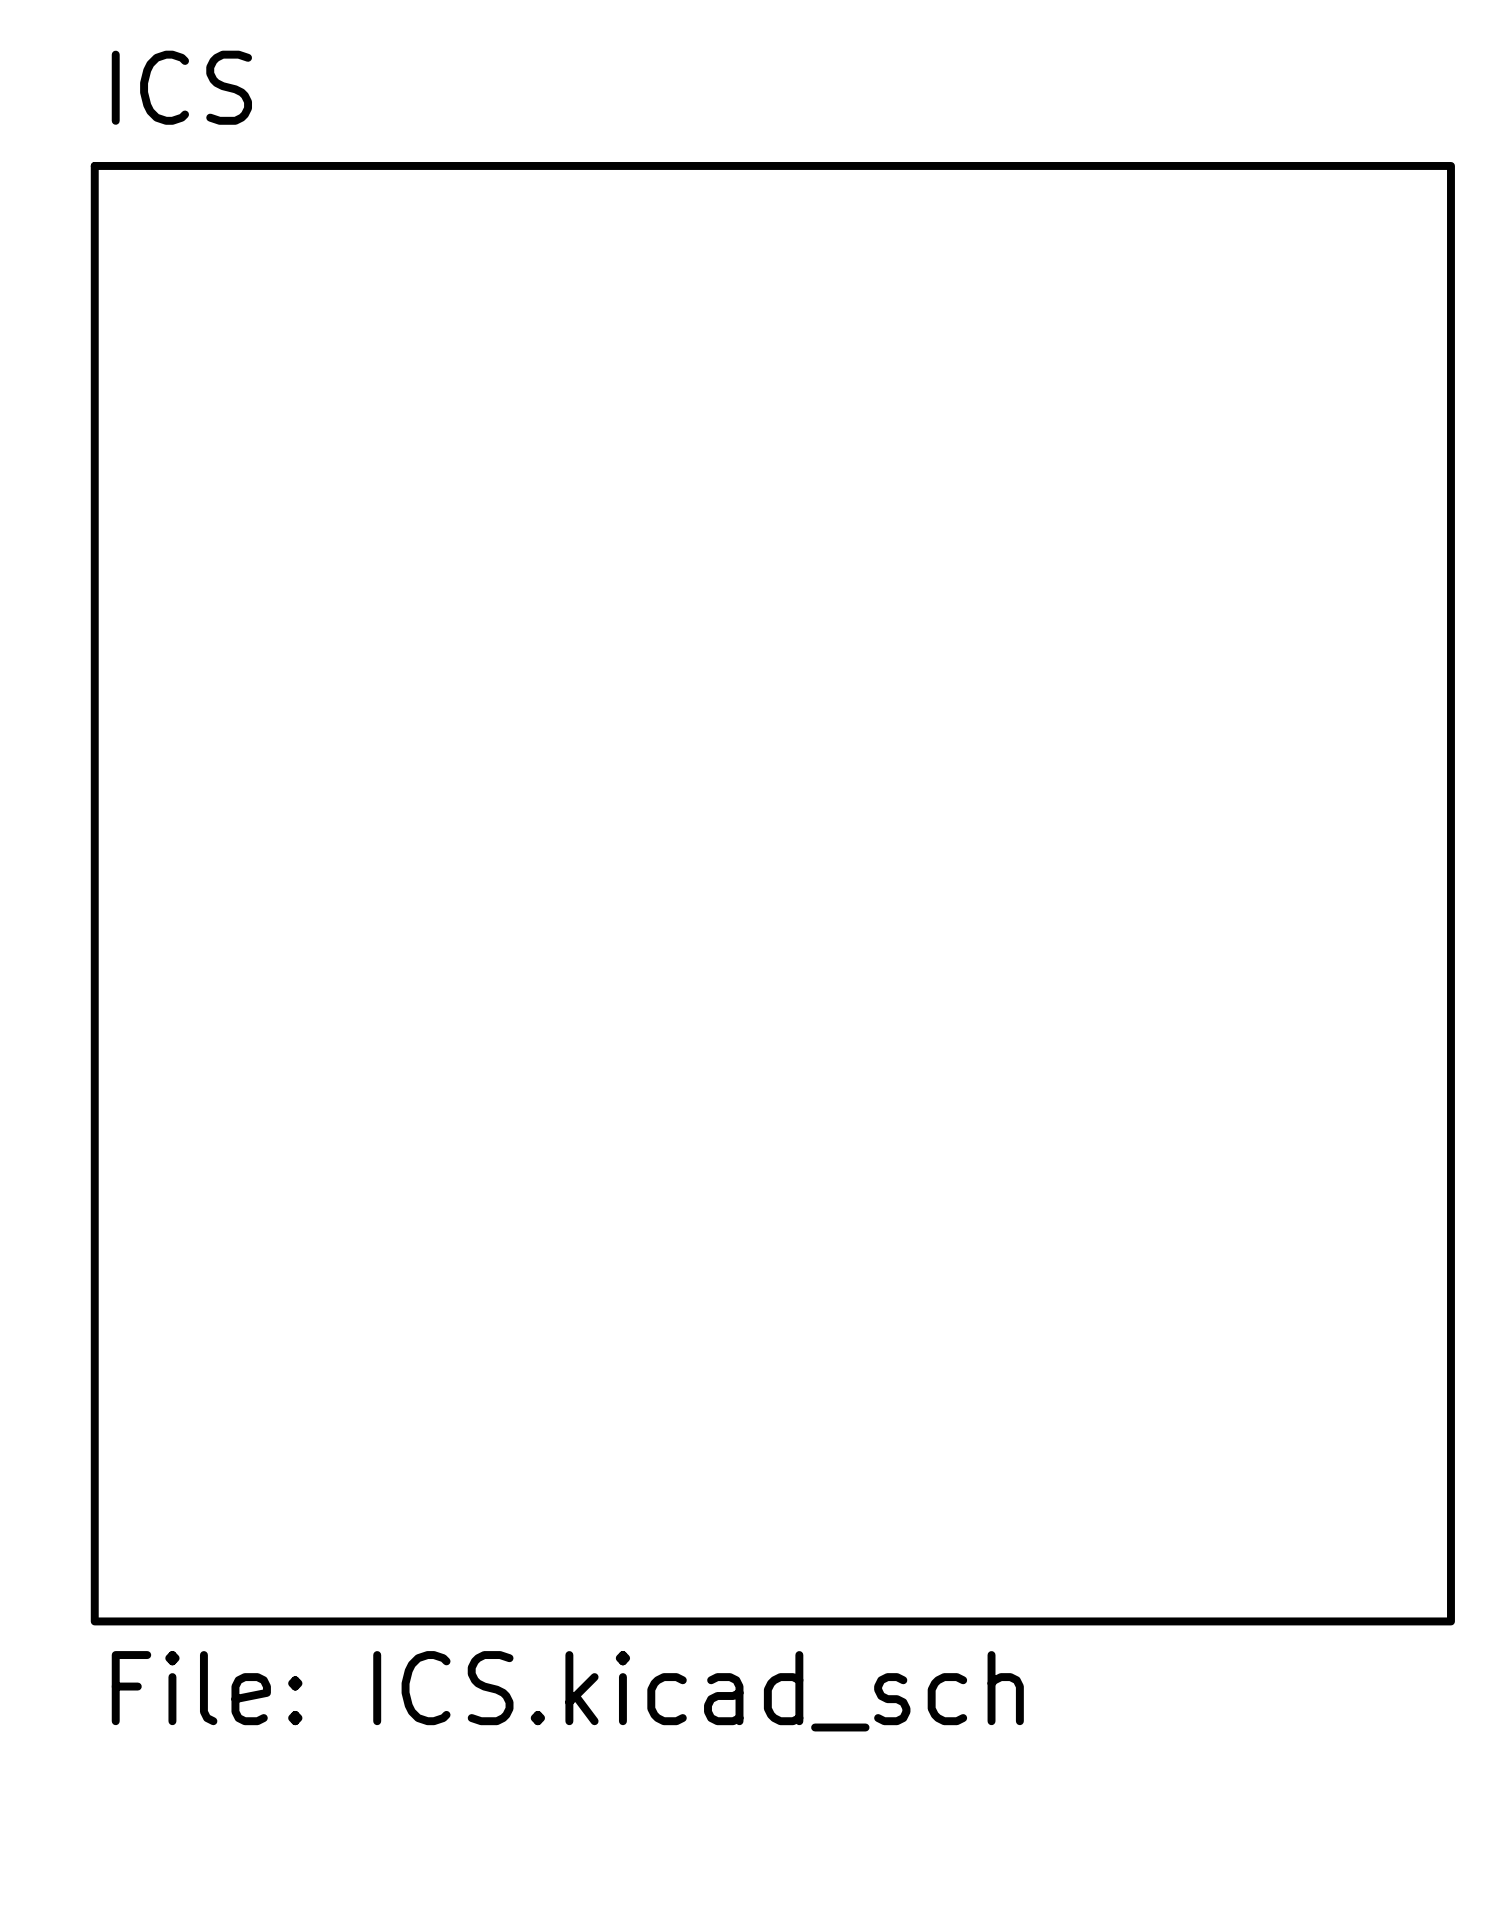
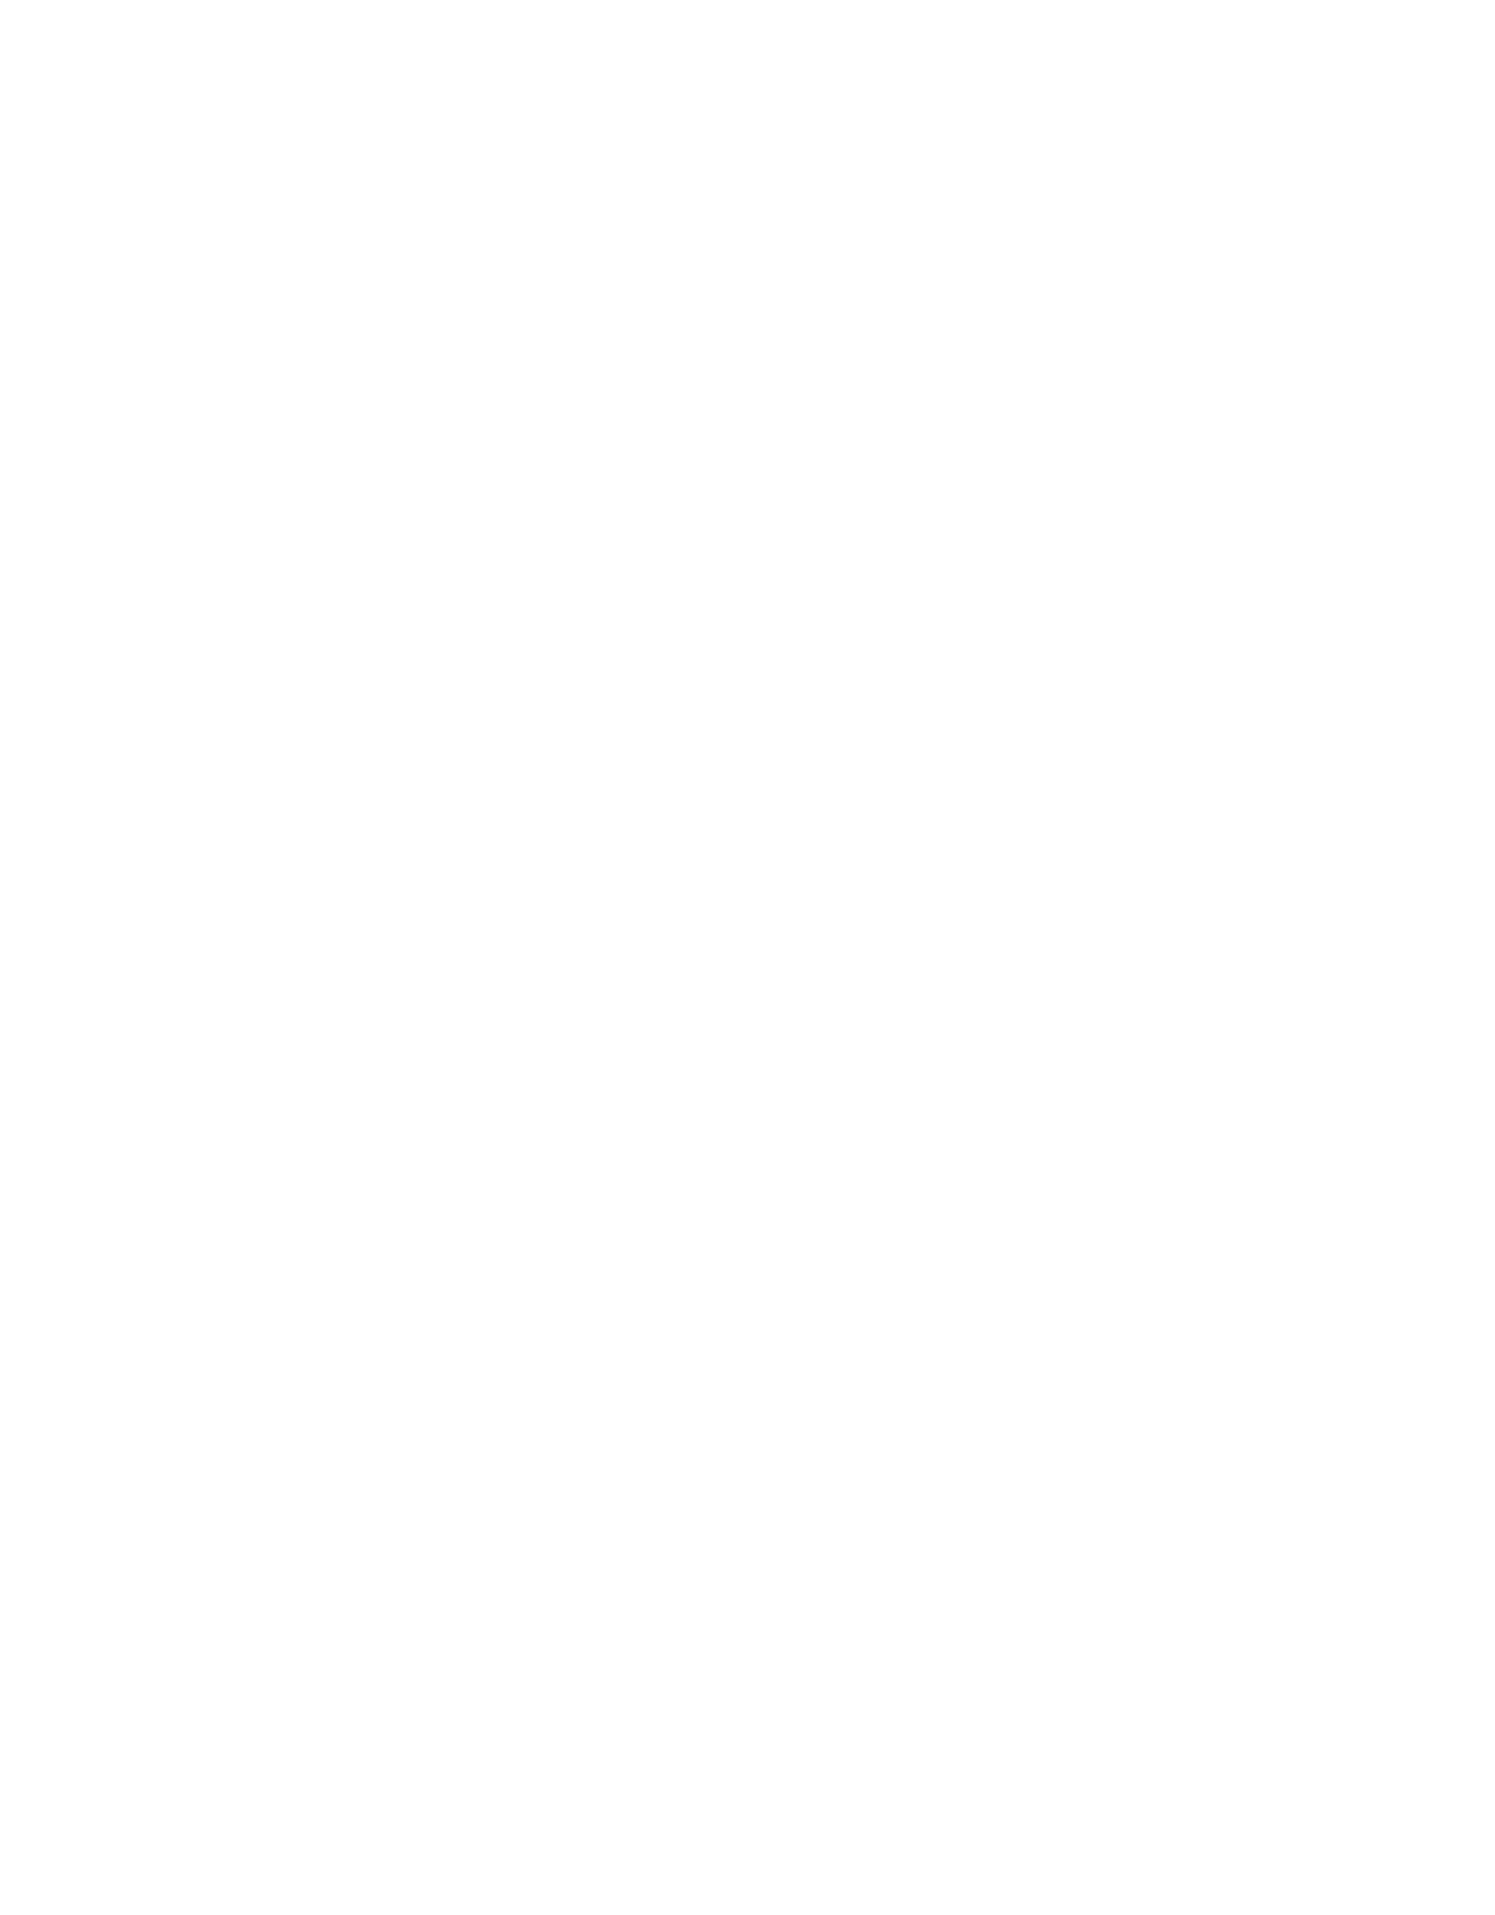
sheet ICS: File: ICS.kicad_sch (772, 893) -> none

